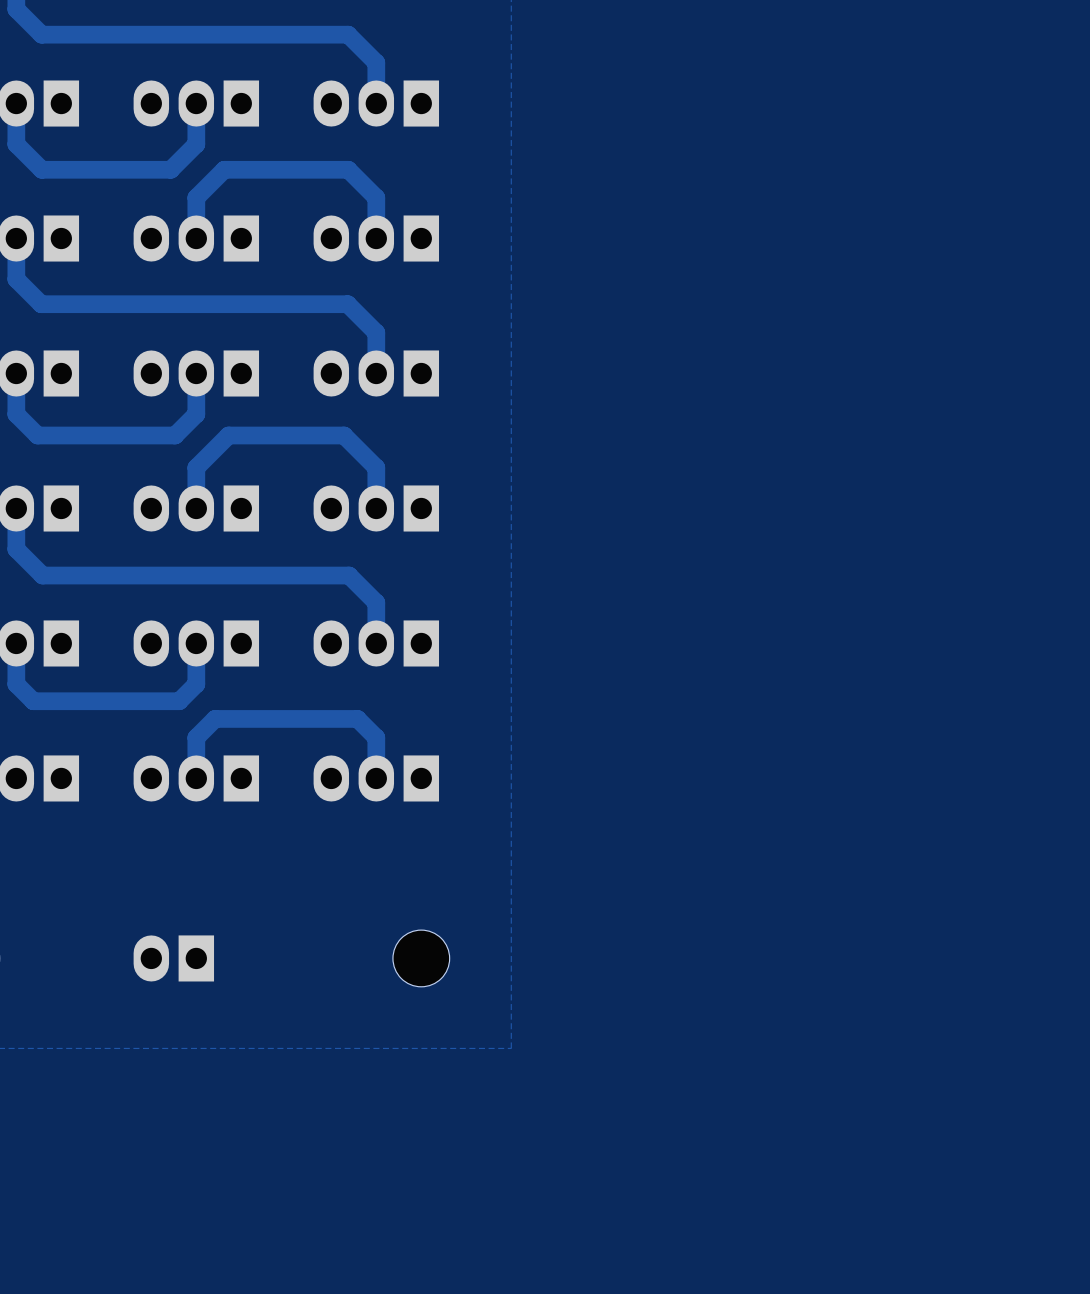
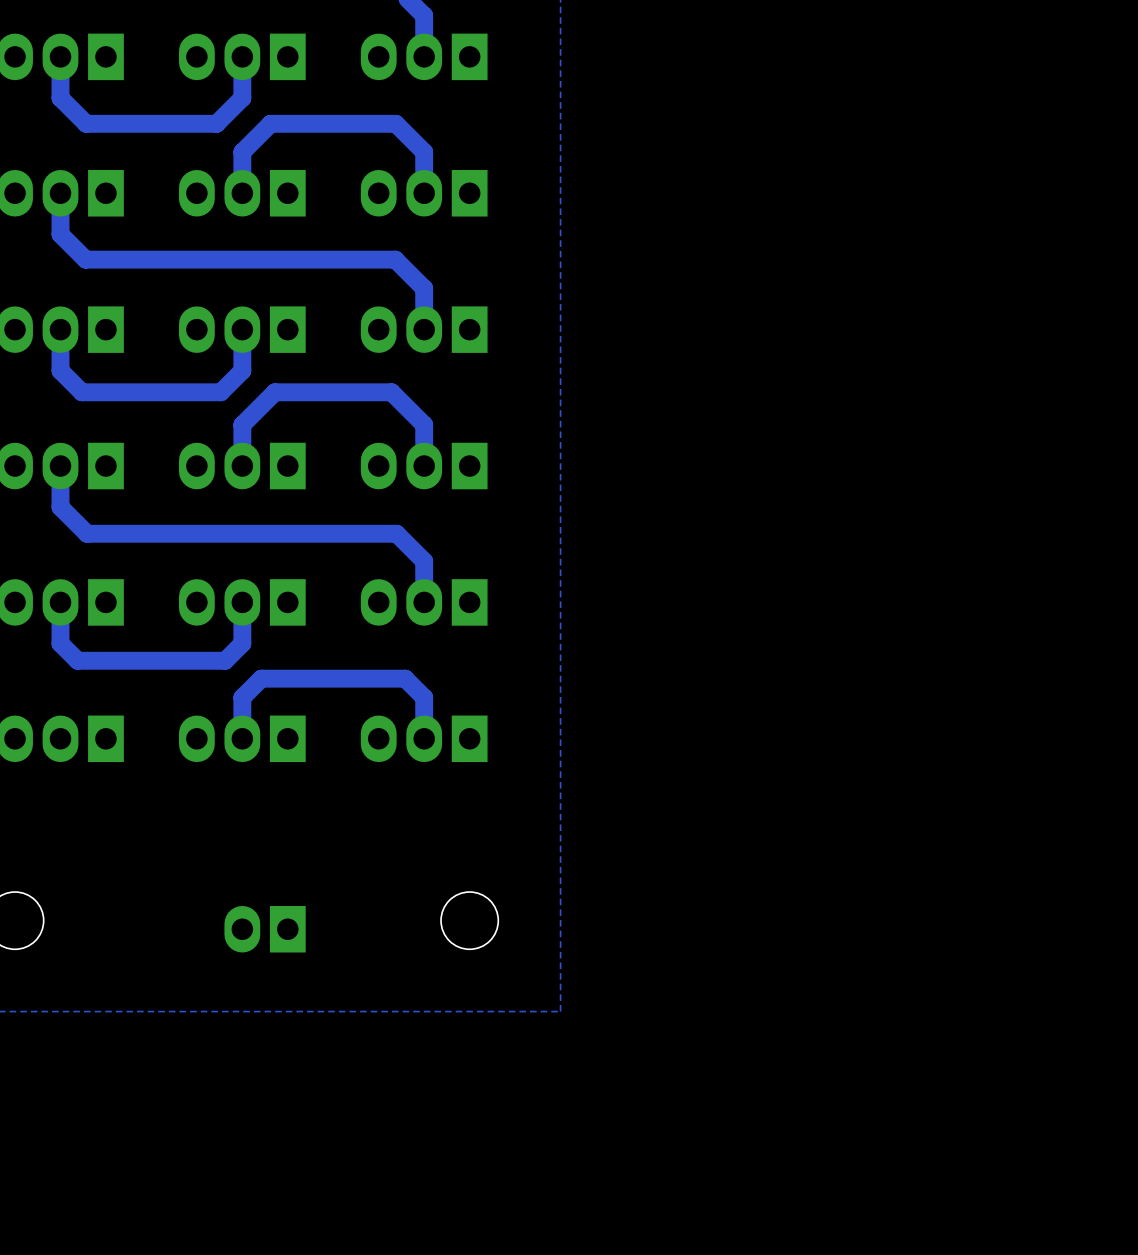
part position: (173, 958) -> (265, 929)

